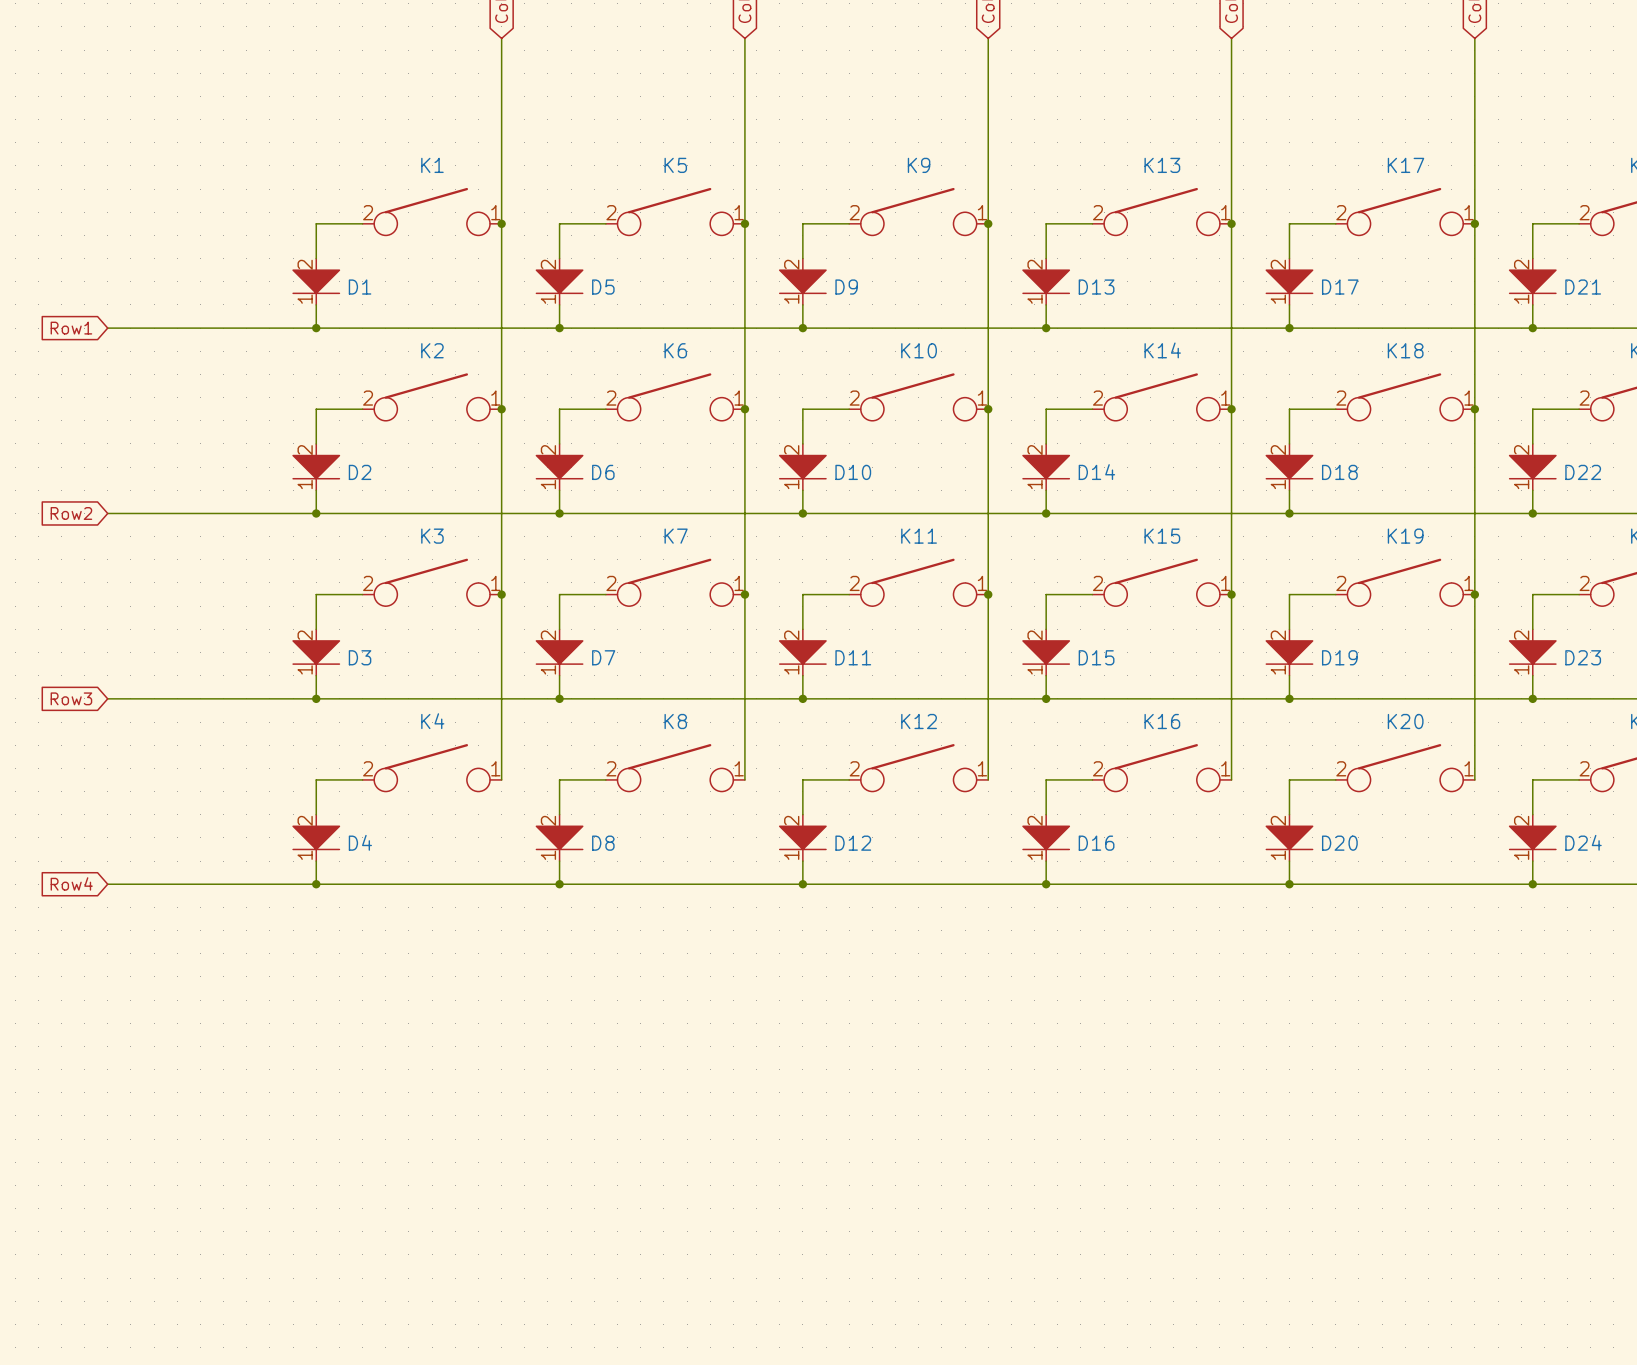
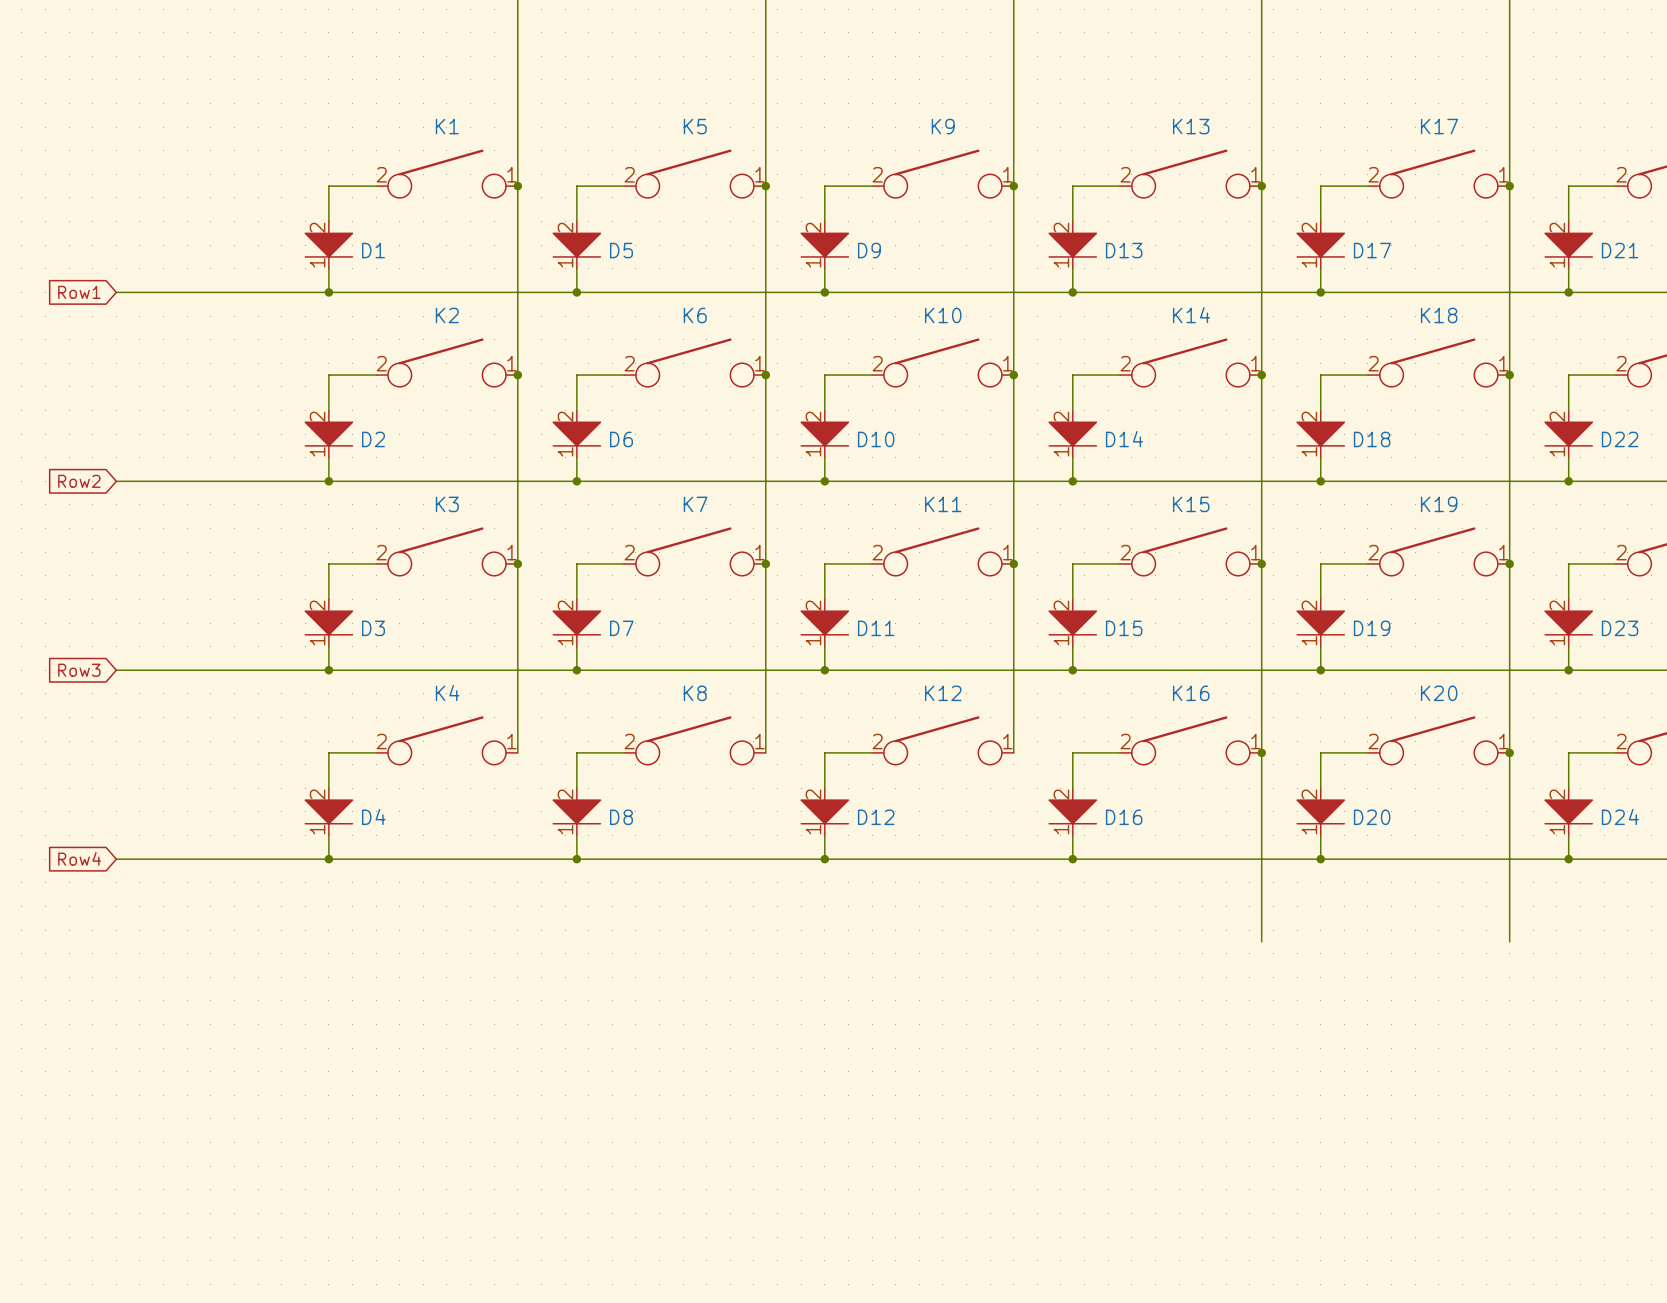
wire: none -> (1261, 752) (1261, 941)
junction: none -> (1261, 752)
wire: none -> (1509, 752) (1509, 941)
junction: none -> (1509, 752)

